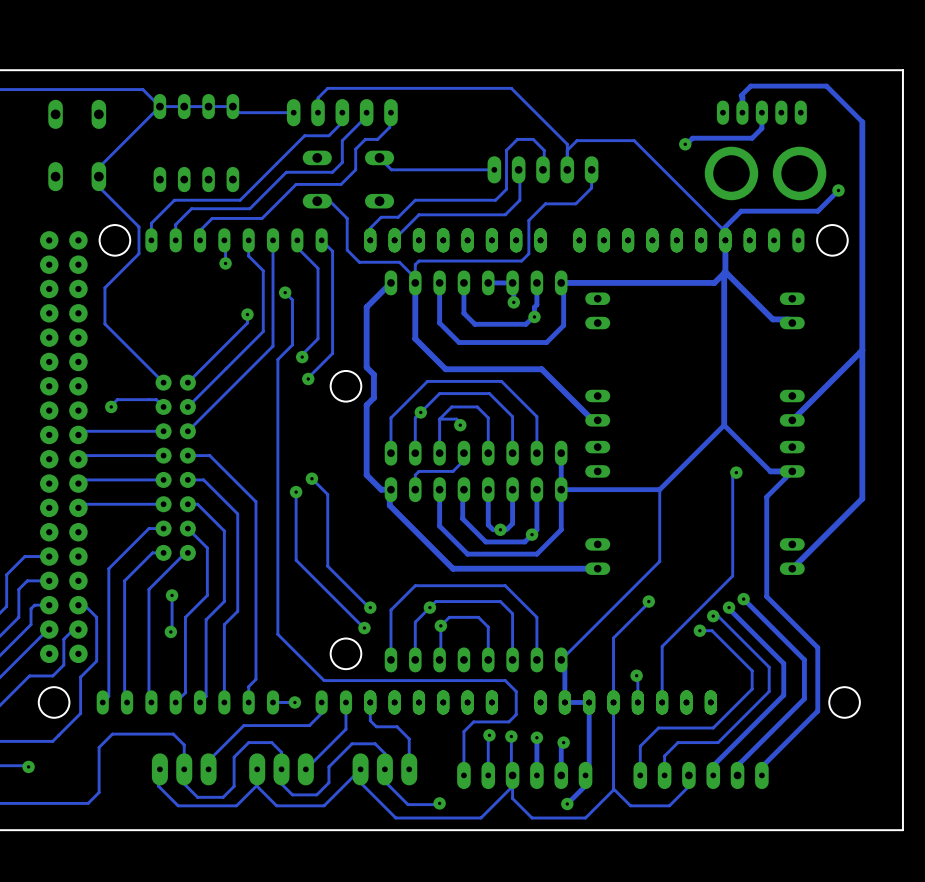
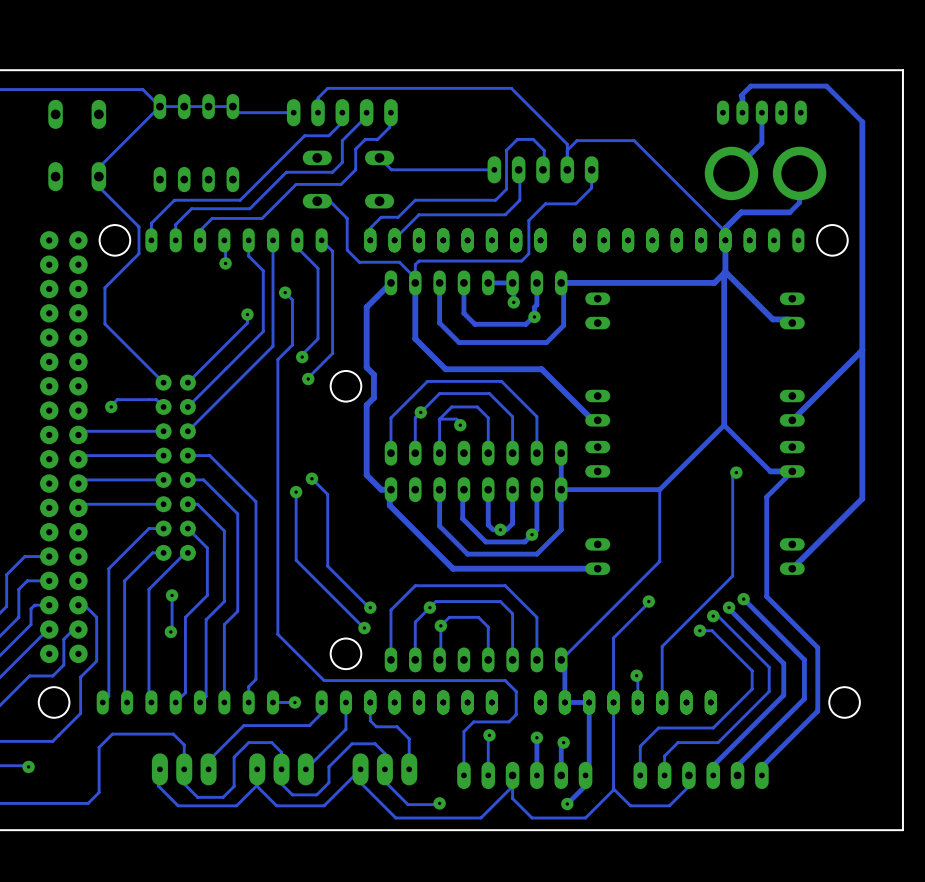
track: (761, 128) (752, 138) (692, 138) (685, 144) -> (761, 128) (761, 143) (731, 173)
via: (685, 144) -> none
track: none -> (799, 173) (799, 202) (789, 212) (741, 212) (725, 228)
track: (838, 190) (817, 211) (741, 211) (722, 229) -> none
via: (838, 190) -> none
track: (463, 453) (463, 460) (453, 471) (418, 471) (415, 475) (415, 489) -> none
track: (511, 736) (512, 775) -> none
via: (511, 736) -> none

